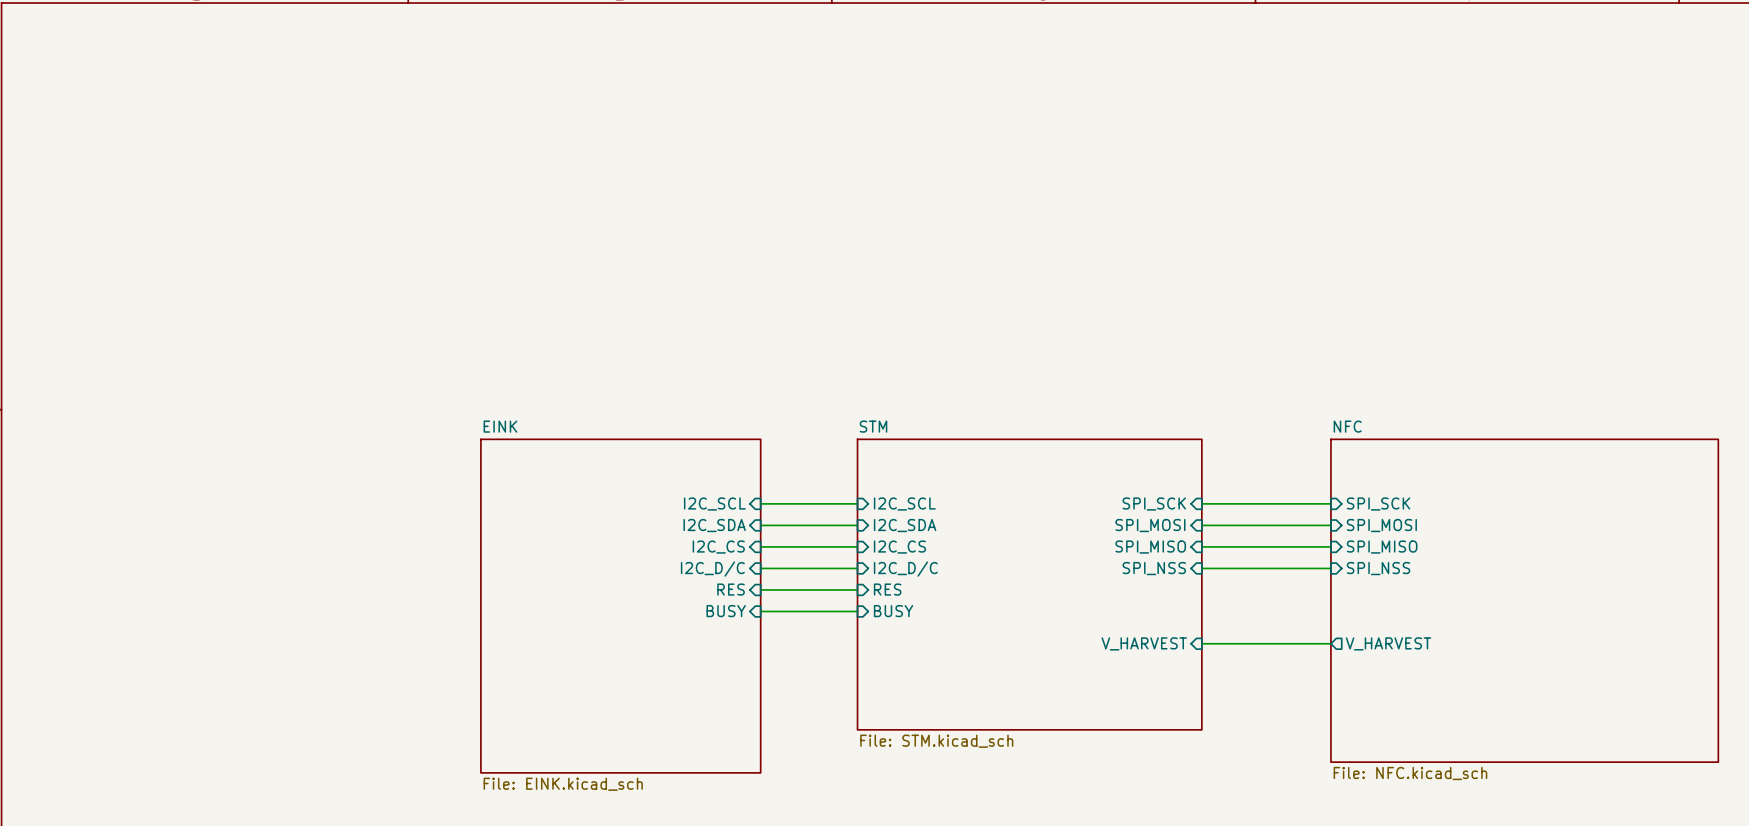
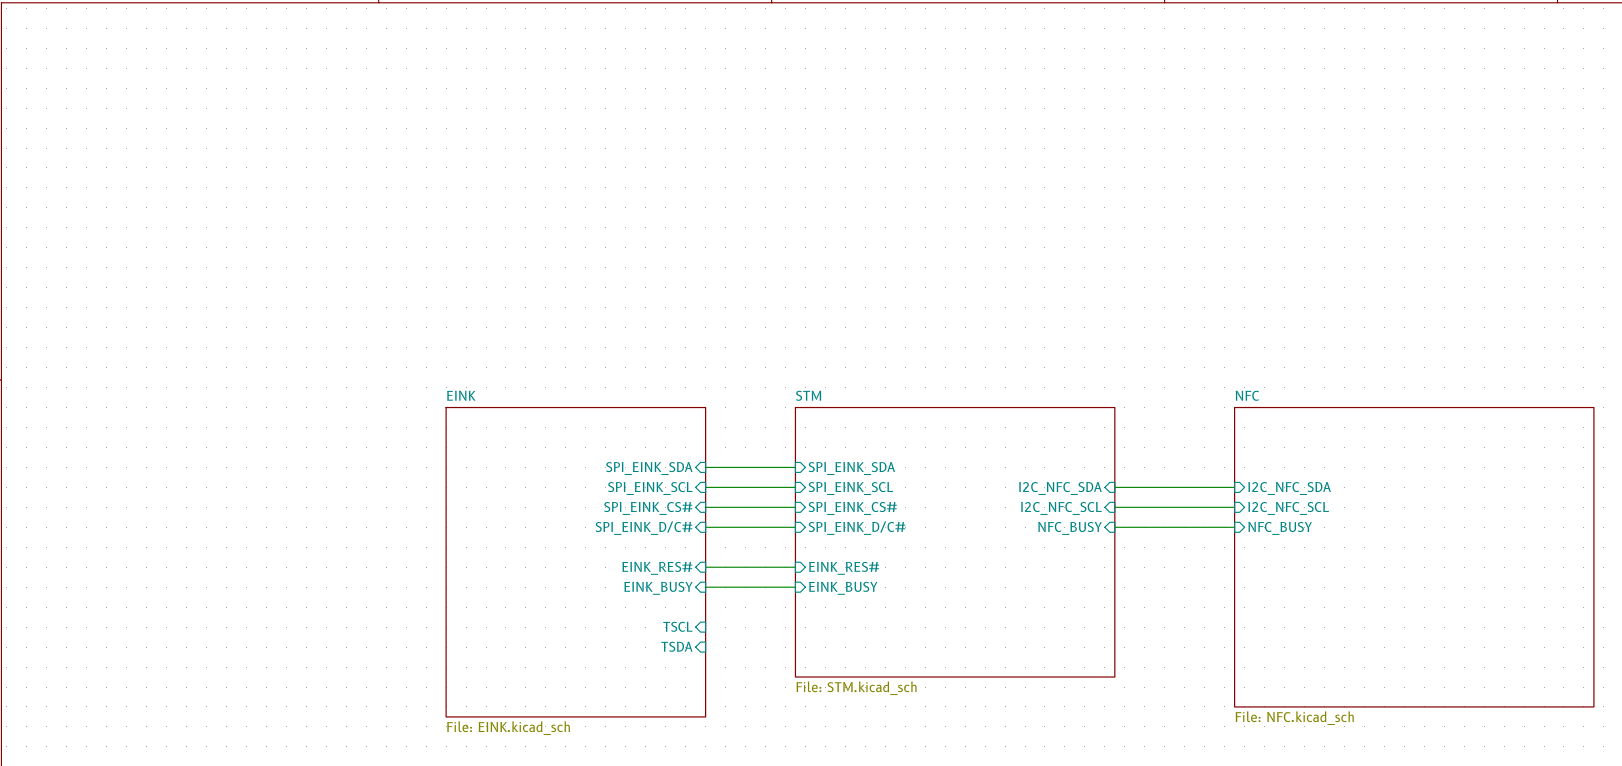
wire: (1201, 503) (1330, 503) -> none
sheet pin: I2C_SCL (714, 504) -> SPI_EINK_SDA (649, 468)
sheet pin: I2C_SCL (904, 504) -> SPI_EINK_SDA (851, 468)
sheet pin: SPI_SCK (1154, 504) -> none
sheet pin: SPI_SCK (1378, 504) -> none
sheet pin: I2C_SDA (714, 525) -> SPI_EINK_SCL (650, 488)
sheet pin: I2C_SDA (905, 525) -> SPI_EINK_SCL (850, 488)
sheet pin: SPI_MOSI (1150, 525) -> I2C_NFC_SDA (1060, 488)
sheet pin: SPI_MOSI (1381, 525) -> I2C_NFC_SDA (1289, 488)
sheet pin: I2C_CS (718, 547) -> SPI_EINK_CS# (648, 508)
sheet pin: I2C_CS (899, 547) -> SPI_EINK_CS# (852, 508)
sheet pin: SPI_MISO (1150, 547) -> I2C_NFC_SCL (1061, 508)
sheet pin: SPI_MISO (1382, 547) -> I2C_NFC_SCL (1288, 508)
sheet pin: SPI_NSS (1154, 568) -> NFC_BUSY (1070, 528)
sheet pin: SPI_NSS (1378, 568) -> NFC_BUSY (1280, 528)
sheet pin: I2C_D/C (712, 569) -> SPI_EINK_D/C# (643, 528)
sheet pin: I2C_D/C (905, 569) -> SPI_EINK_D/C# (856, 528)
sheet pin: RES (731, 589) -> none
wire: (760, 589) (857, 589) -> (705, 587) (795, 587)
sheet pin: RES (887, 589) -> none
sheet pin: BUSY (726, 611) -> EINK_RES# (657, 568)
sheet pin: BUSY (893, 611) -> EINK_RES# (844, 568)
sheet pin: none -> EINK_BUSY (658, 588)
sheet pin: none -> EINK_BUSY (843, 588)
sheet pin: V_HARVEST (1144, 643) -> none
wire: (1201, 643) (1330, 643) -> none
sheet pin: V_HARVEST (1388, 643) -> none
sheet pin: none -> TSCL (677, 626)
sheet pin: none -> TSDA (676, 646)

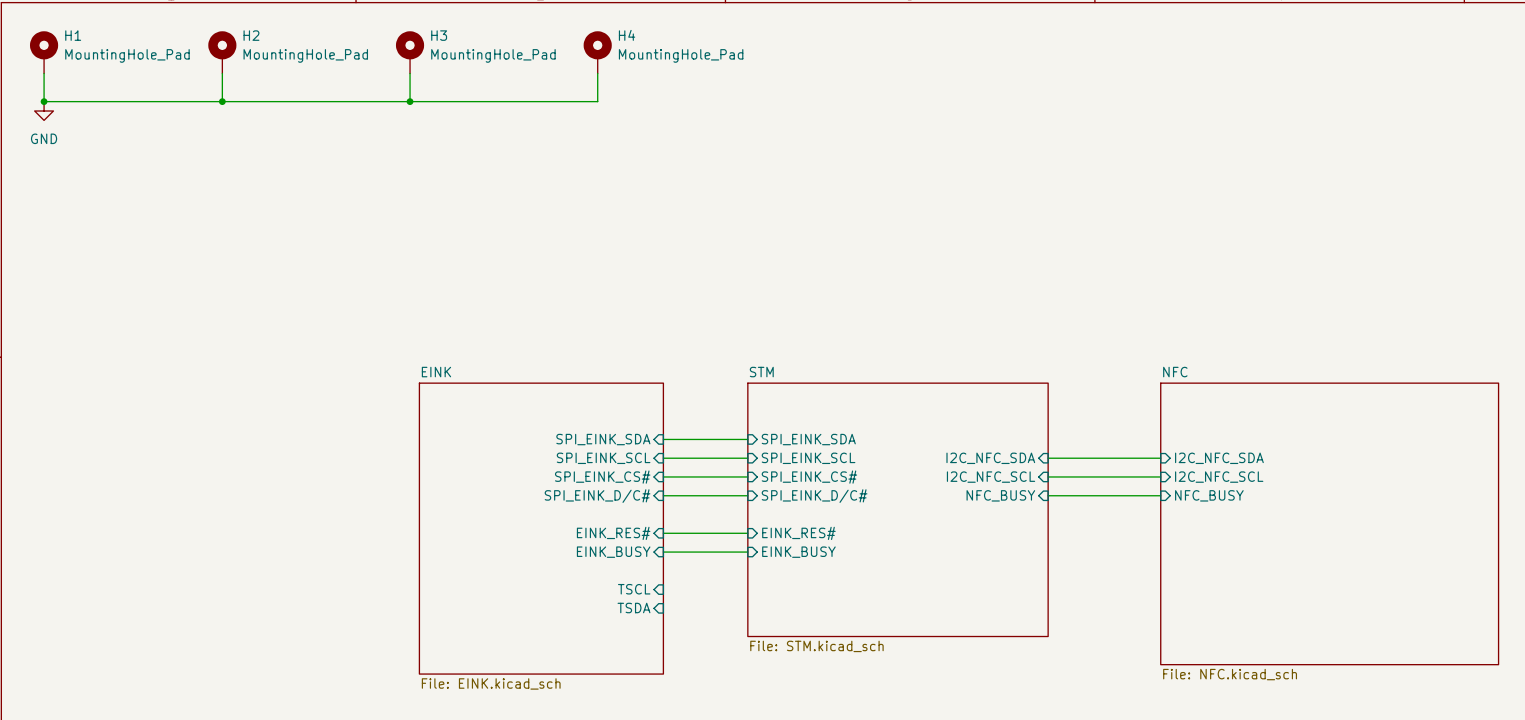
H1: none -> MountingHole_Pad (44, 52)
H2: none -> MountingHole_Pad (222, 52)
H3: none -> MountingHole_Pad (410, 52)
H4: none -> MountingHole_Pad (597, 52)
wire: none -> (44, 73) (44, 101) (597, 101) (597, 73)
wire: none -> (222, 73) (222, 101)
wire: none -> (410, 73) (410, 101)
junction: none -> (44, 101)
junction: none -> (222, 101)
junction: none -> (410, 101)
power symbol: none -> GND (44, 111)

